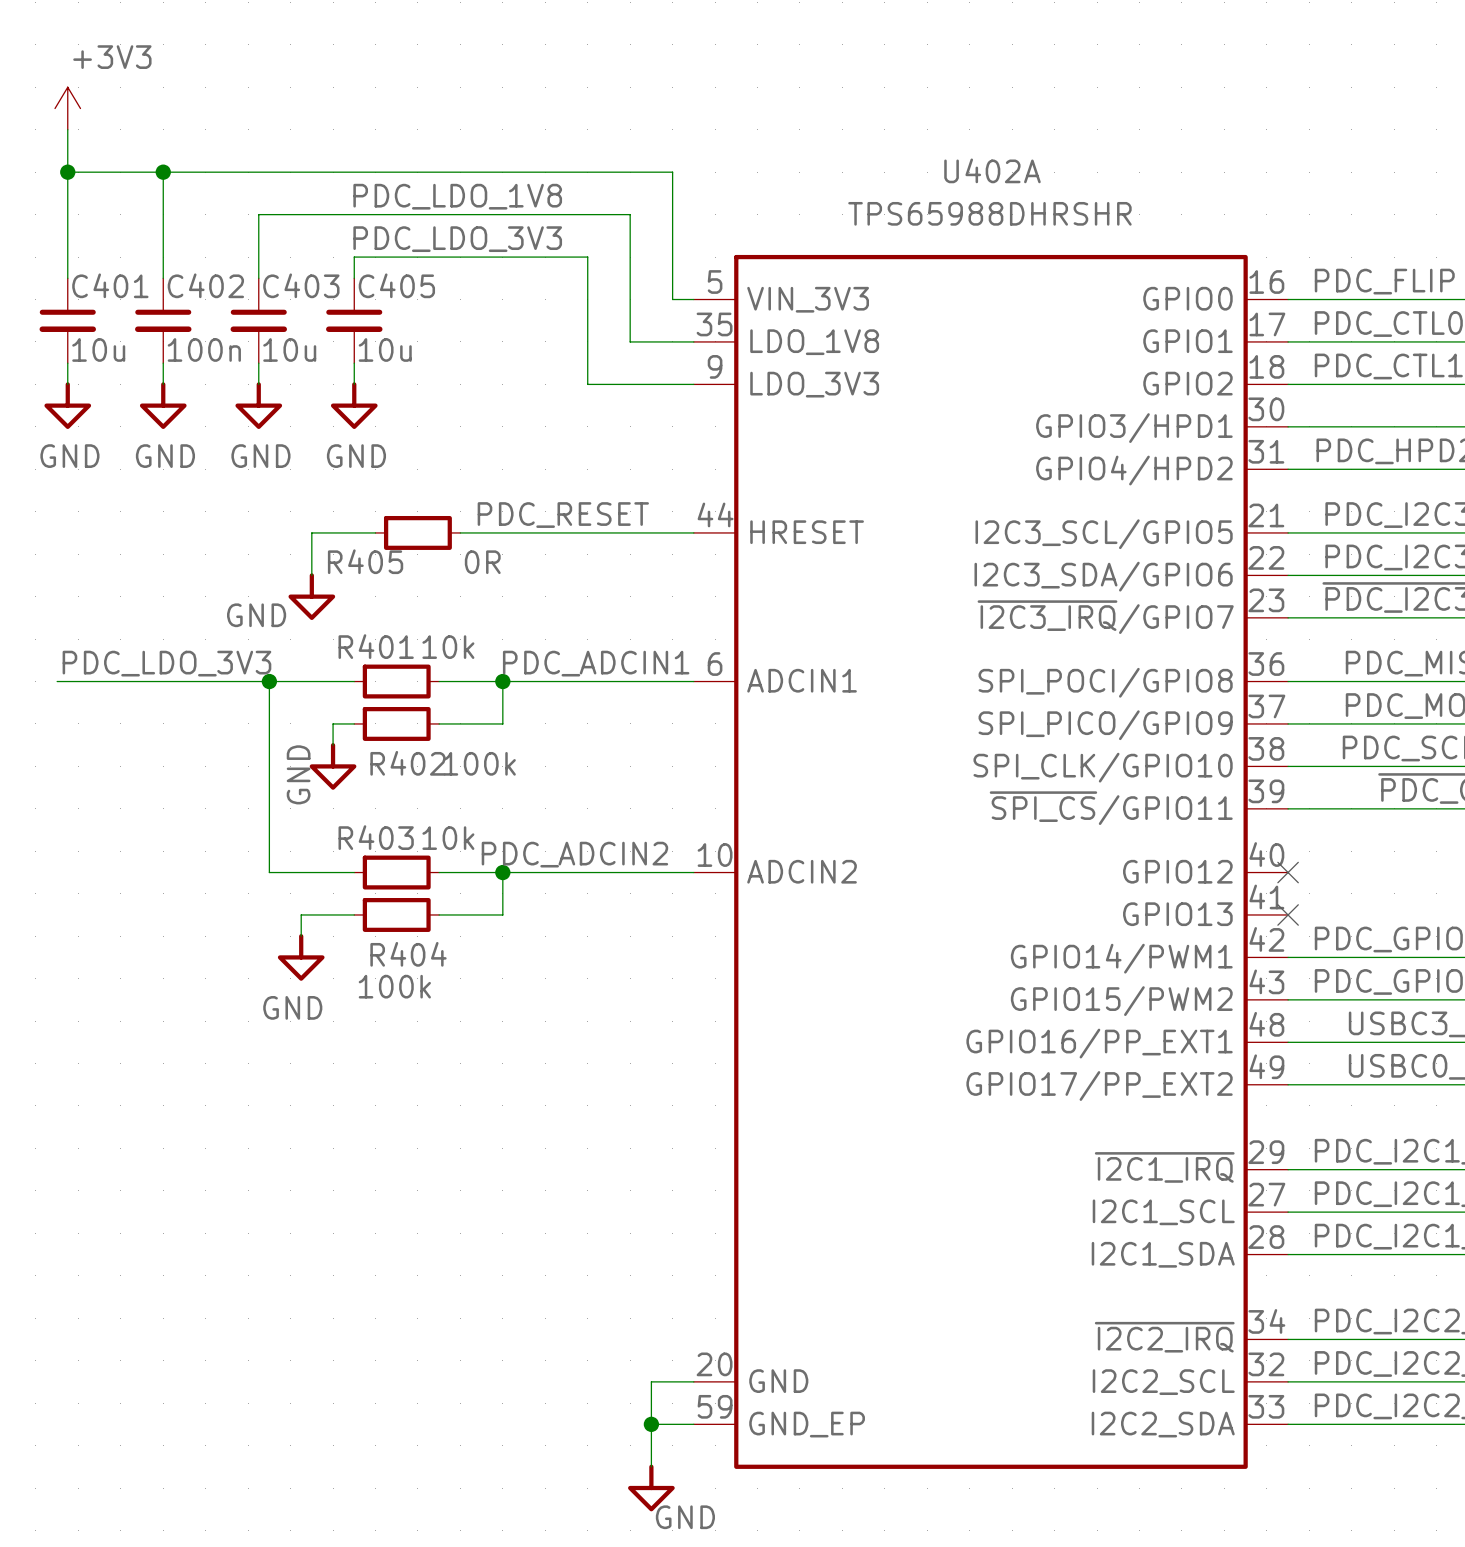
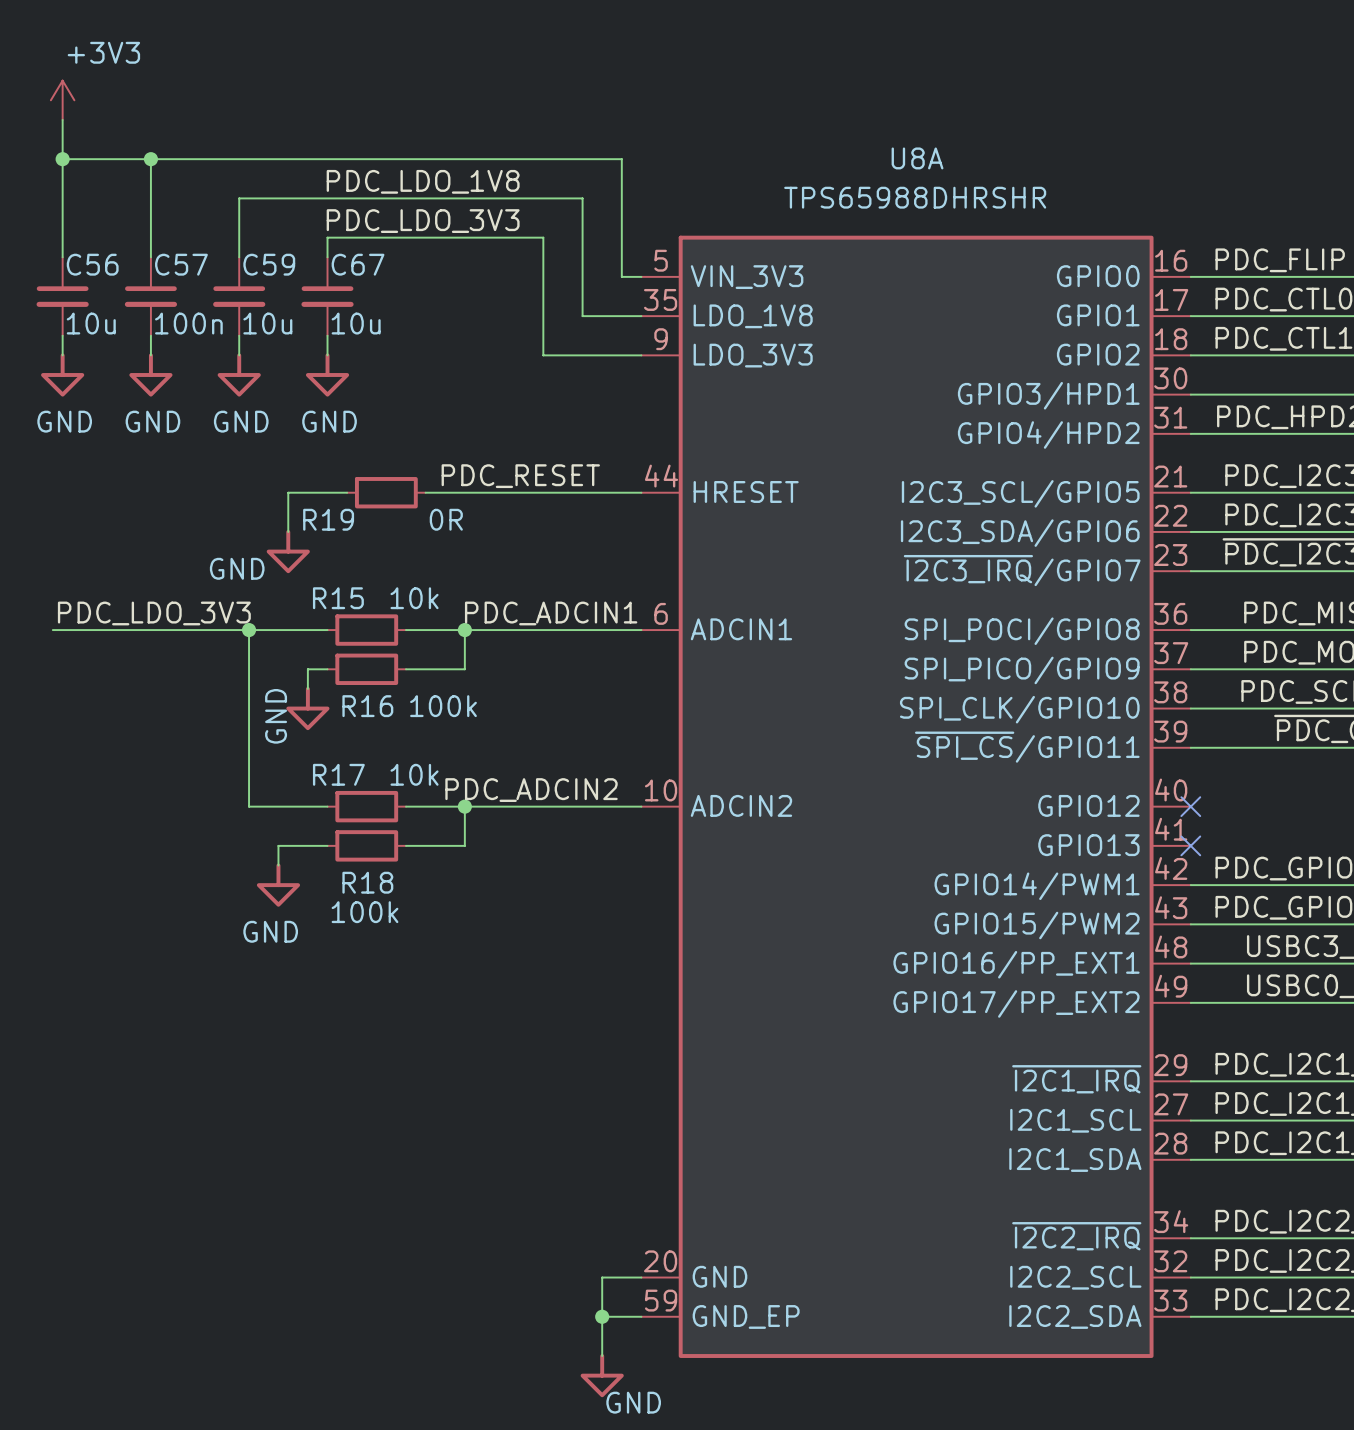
U402A name: U402A (992, 170) -> U8A (917, 158)
C401 name: C401 (110, 285) -> C56 (92, 264)
C402 name: C402 (205, 285) -> C57 (181, 264)
C403 name: C403 (301, 285) -> C59 (269, 264)
C405 name: C405 (396, 285) -> C67 (358, 264)
R405 name: R405 (365, 561) -> R19 (328, 519)
R401 name: R401 (376, 646) -> R15 (338, 598)
R402 name: R402 (407, 763) -> R16 (367, 706)
R403 name: R403 (376, 837) -> R17 (338, 774)
R404 name: R404 (408, 954) -> R18 (367, 882)

